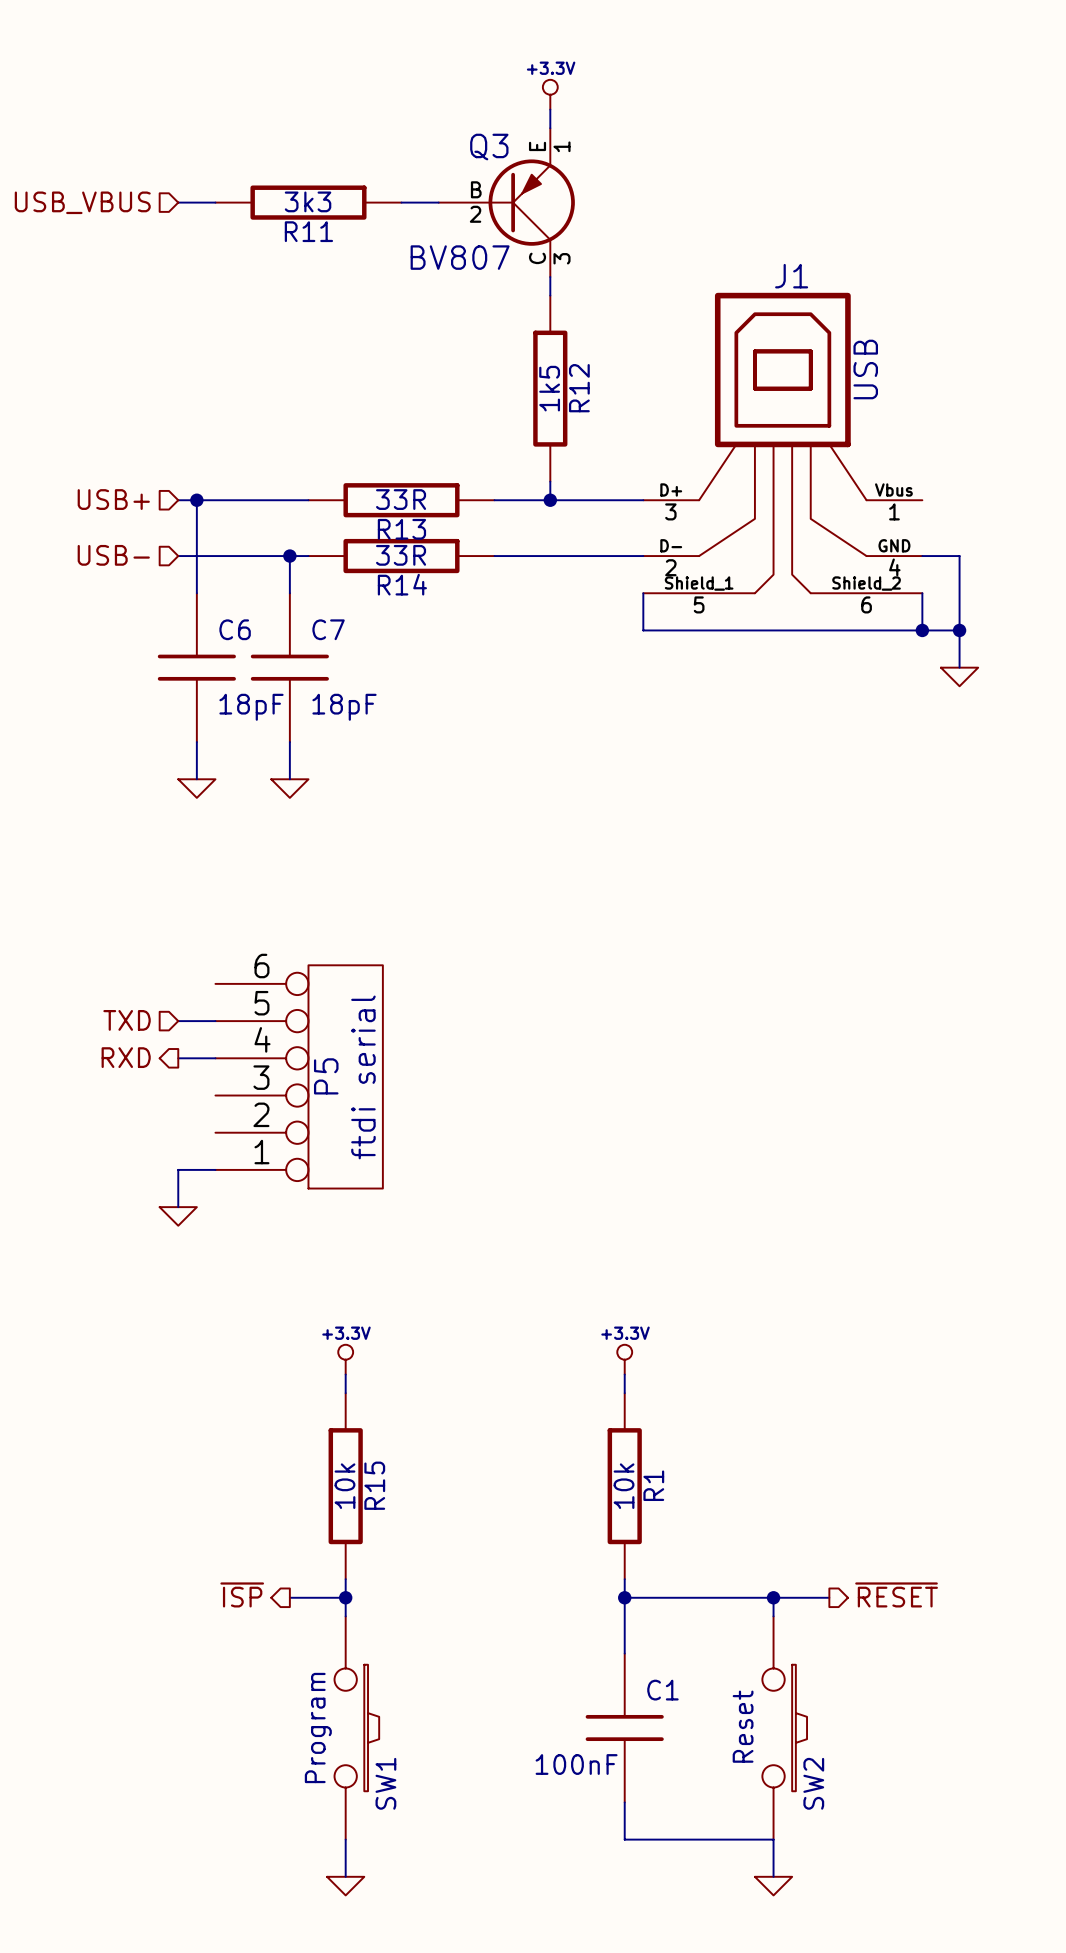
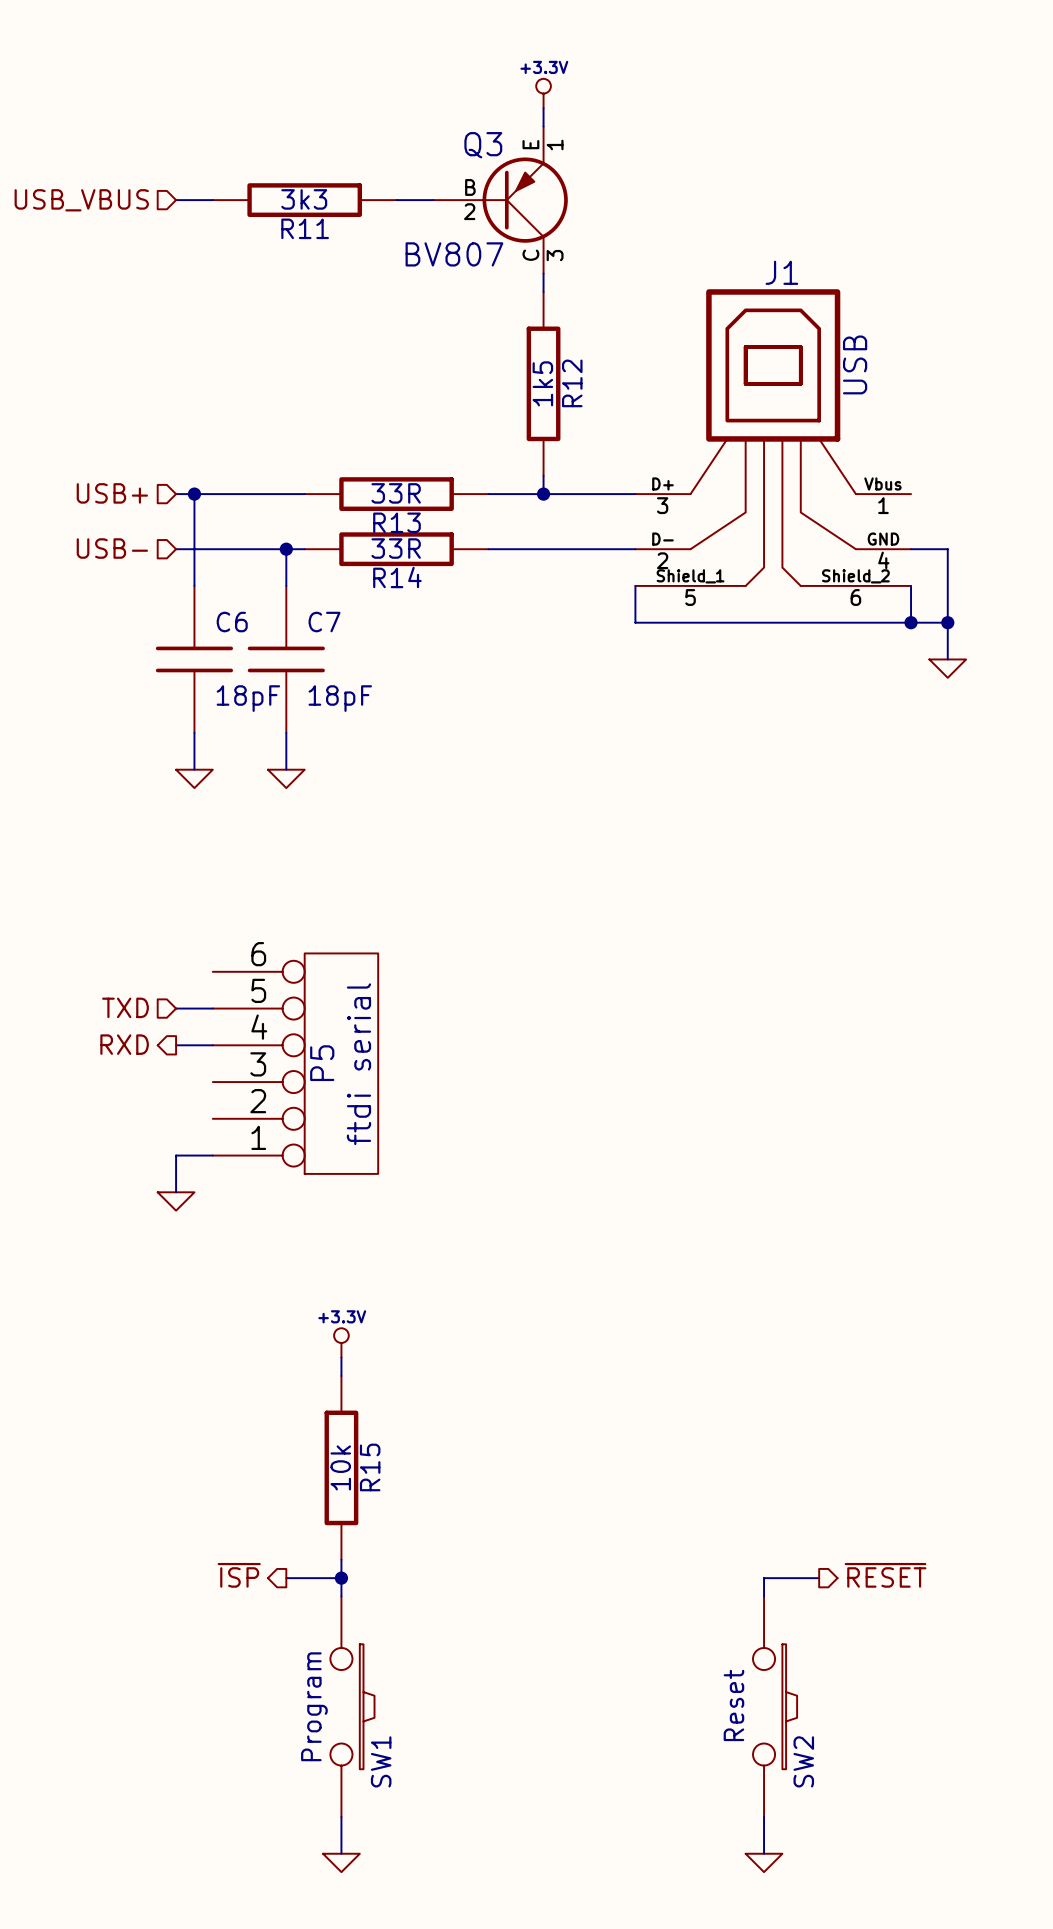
power symbol: +3.3V (624, 1359) -> none
wire: (624, 1374) (624, 1393) -> none
R1: 10k (624, 1486) -> none
wire: (624, 1579) (624, 1653) -> none
wire: (624, 1597) (773, 1597) -> none
junction: (624, 1597) -> none
junction: (773, 1597) -> none
C1: 100nF (624, 1727) -> none
wire: (624, 1802) (624, 1839) (773, 1839) -> none

